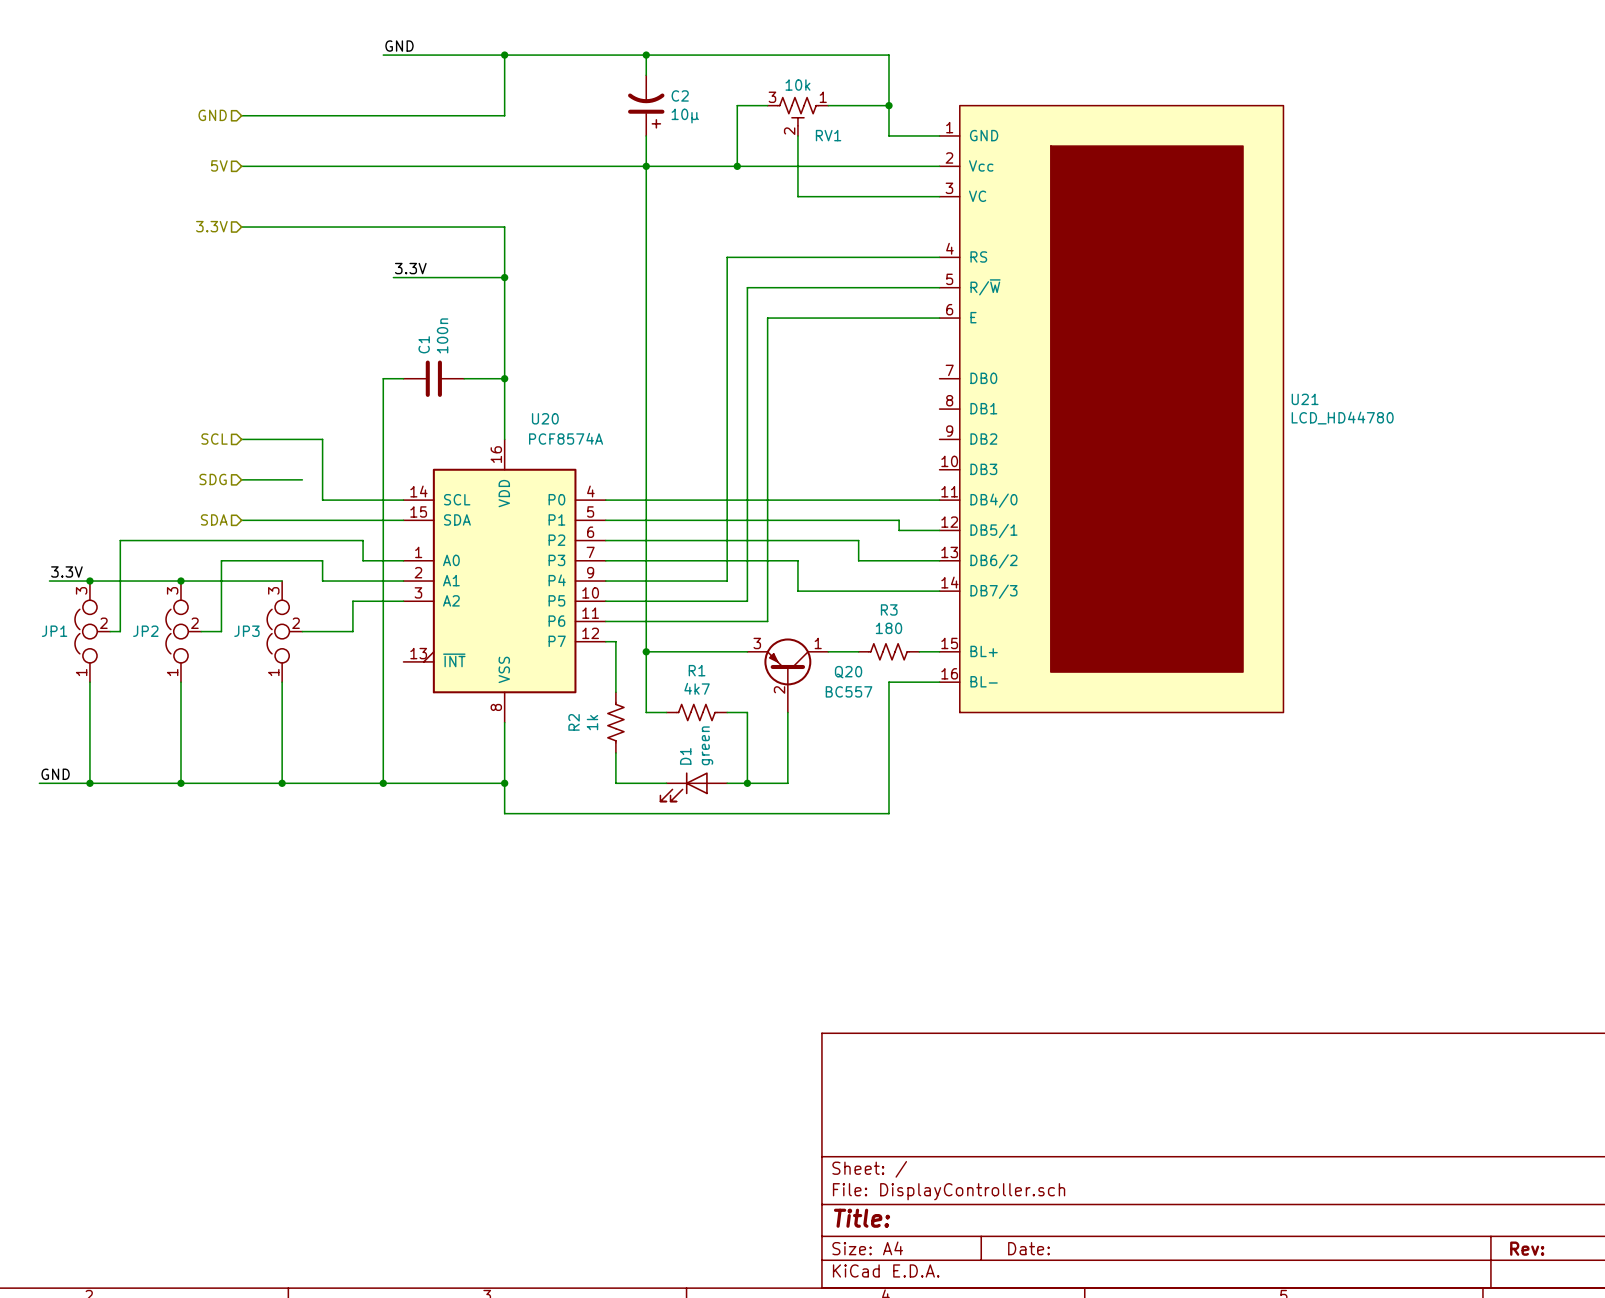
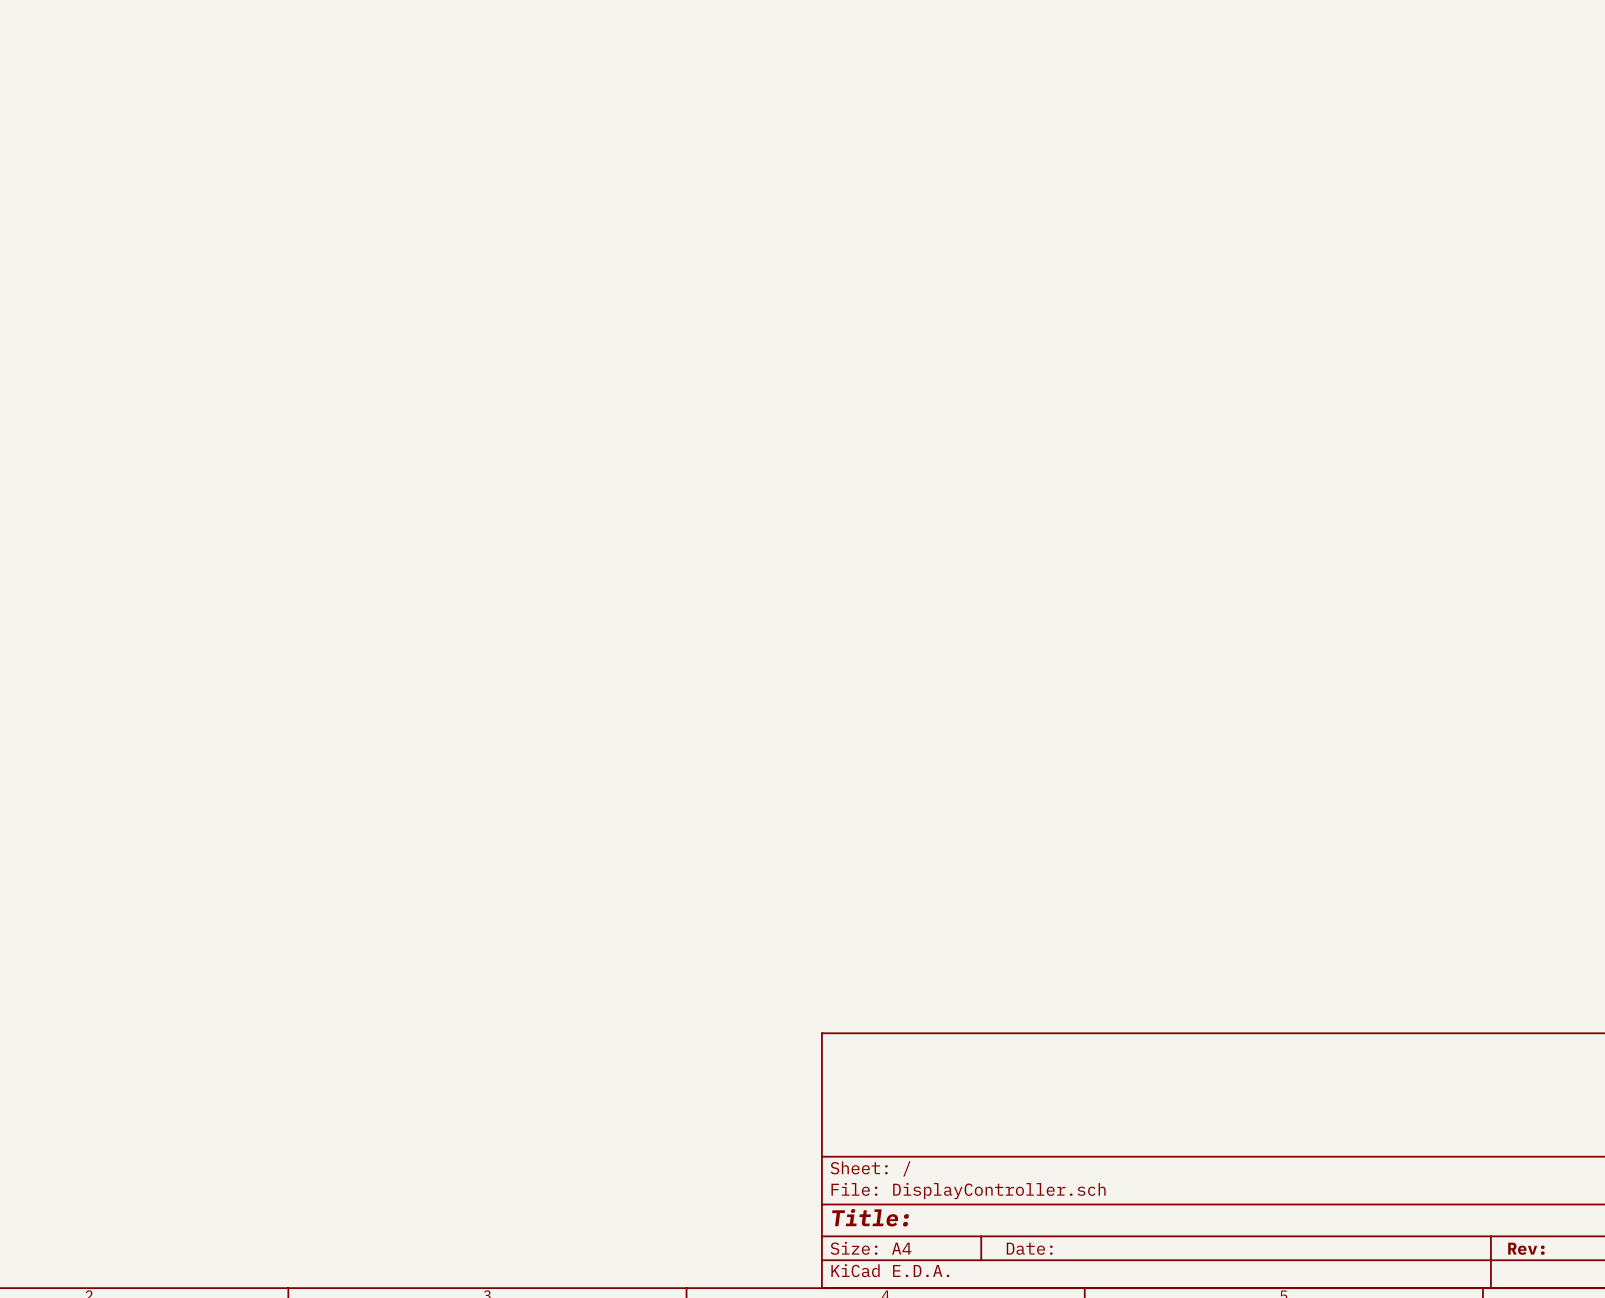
label: GND (399, 46) -> none
wire: (383, 55) (889, 55) (889, 135) (939, 135) -> none
wire: (504, 55) (504, 115) (241, 115) -> none
junction: (504, 55) -> none
wire: (646, 55) (646, 75) -> none
junction: (646, 55) -> none
C2: 10µ (646, 105) -> none
wire: (767, 105) (737, 105) (737, 166) -> none
wire: (828, 105) (889, 105) -> none
junction: (889, 105) -> none
hierarchical label: GND (212, 115) -> none
RV1: 10k (797, 116) -> none
wire: (646, 135) (646, 712) (666, 712) -> none
wire: (797, 135) (797, 196) (939, 196) -> none
hierarchical label: 5V (219, 165) -> none
wire: (241, 166) (939, 166) -> none
junction: (646, 166) -> none
junction: (737, 166) -> none
hierarchical label: 3.3V (211, 226) -> none
wire: (241, 227) (504, 227) (504, 439) -> none
wire: (939, 257) (727, 257) (727, 581) (605, 581) -> none
label: 3.3V (410, 268) -> none
wire: (393, 277) (504, 277) -> none
junction: (504, 277) -> none
wire: (939, 287) (747, 287) (747, 601) (605, 601) -> none
wire: (939, 318) (767, 318) (767, 621) (605, 621) -> none
wire: (403, 378) (383, 378) (383, 783) -> none
C1: 100n (433, 378) -> none
wire: (464, 378) (504, 378) -> none
junction: (504, 378) -> none
U21: LCD_HD44780 (1111, 409) -> none
hierarchical label: SCL (214, 439) -> none
wire: (241, 439) (322, 439) (322, 500) (403, 500) -> none
hierarchical label: SDG (213, 479) -> none
wire: (241, 479) (302, 479) -> none
wire: (605, 500) (939, 500) -> none
hierarchical label: SDA (214, 519) -> none
wire: (241, 520) (403, 520) -> none
wire: (605, 520) (899, 520) (899, 530) (939, 530) -> none
wire: (605, 540) (858, 540) (858, 560) (939, 560) -> none
wire: (403, 560) (363, 560) (363, 540) (120, 540) (120, 631) (110, 631) -> none
wire: (605, 560) (797, 560) (797, 591) (939, 591) -> none
label: 3.3V (66, 571) -> none
wire: (49, 581) (282, 581) -> none
junction: (89, 581) -> none
junction: (180, 581) -> none
wire: (403, 581) (322, 581) (322, 560) (221, 560) (221, 631) (201, 631) -> none
U20: PCF8574A (504, 581) -> none
wire: (403, 601) (352, 601) (352, 631) (302, 631) -> none
JP1: (92, 631) -> none
JP2: (183, 631) -> none
JP3: (284, 631) -> none
wire: (605, 641) (615, 641) (615, 692) -> none
wire: (646, 651) (747, 651) -> none
junction: (646, 651) -> none
wire: (828, 651) (858, 651) -> none
R3: 180 (889, 651) -> none
wire: (919, 651) (939, 651) -> none
Q20: BC557 (787, 675) -> none
wire: (89, 682) (89, 783) -> none
wire: (180, 682) (180, 783) -> none
wire: (282, 682) (282, 783) -> none
wire: (939, 682) (889, 682) (889, 813) (504, 813) (504, 722) -> none
R1: 4k7 (696, 712) -> none
wire: (727, 712) (747, 712) (747, 783) -> none
wire: (787, 712) (787, 783) (727, 783) -> none
R2: 1k (615, 722) -> none
wire: (615, 752) (615, 783) (666, 783) -> none
label: GND (55, 774) -> none
wire: (39, 783) (504, 783) -> none
junction: (89, 783) -> none
junction: (180, 783) -> none
junction: (282, 783) -> none
junction: (383, 783) -> none
junction: (504, 783) -> none
junction: (747, 783) -> none
D1: green (693, 786) -> none

